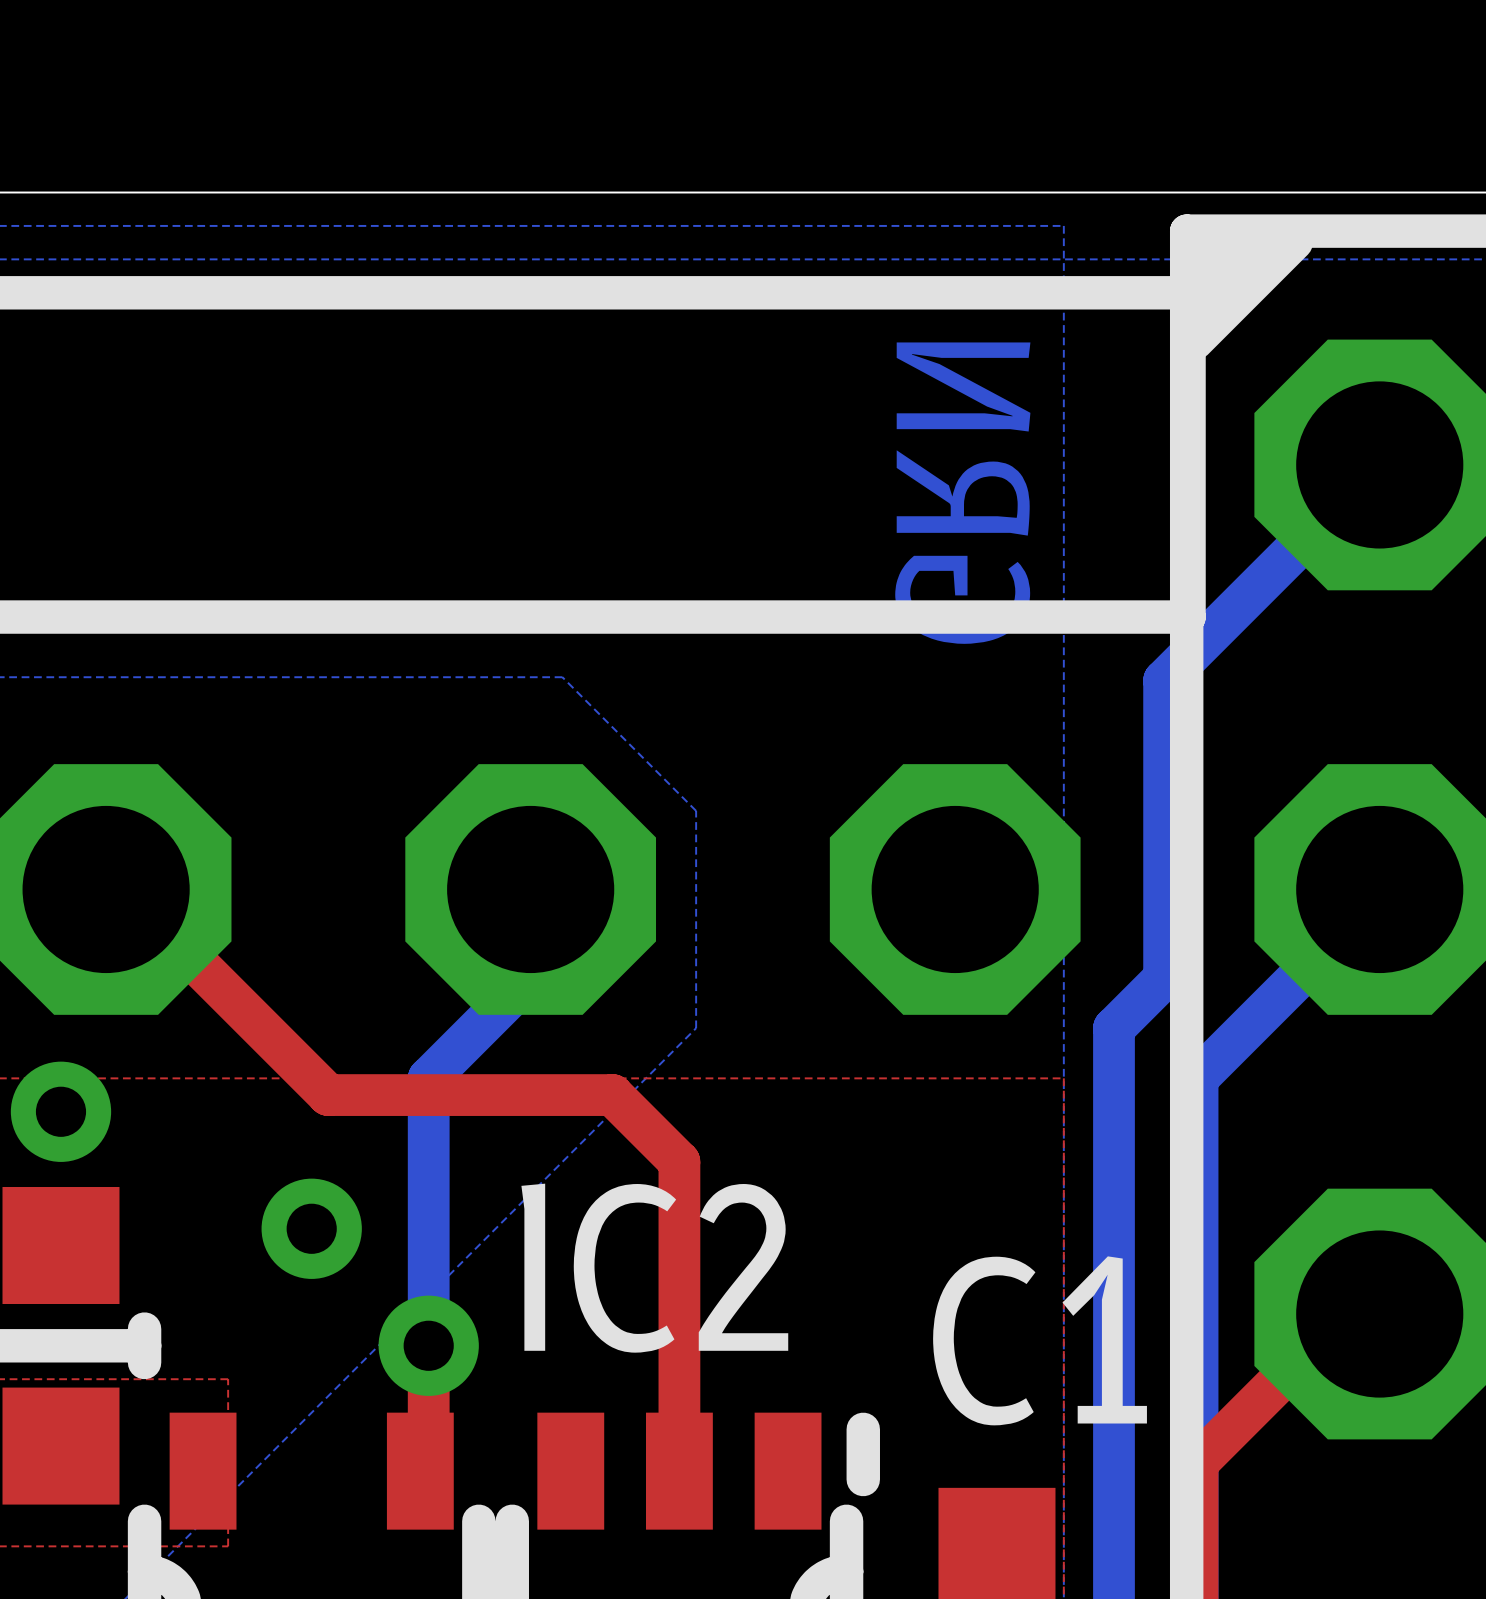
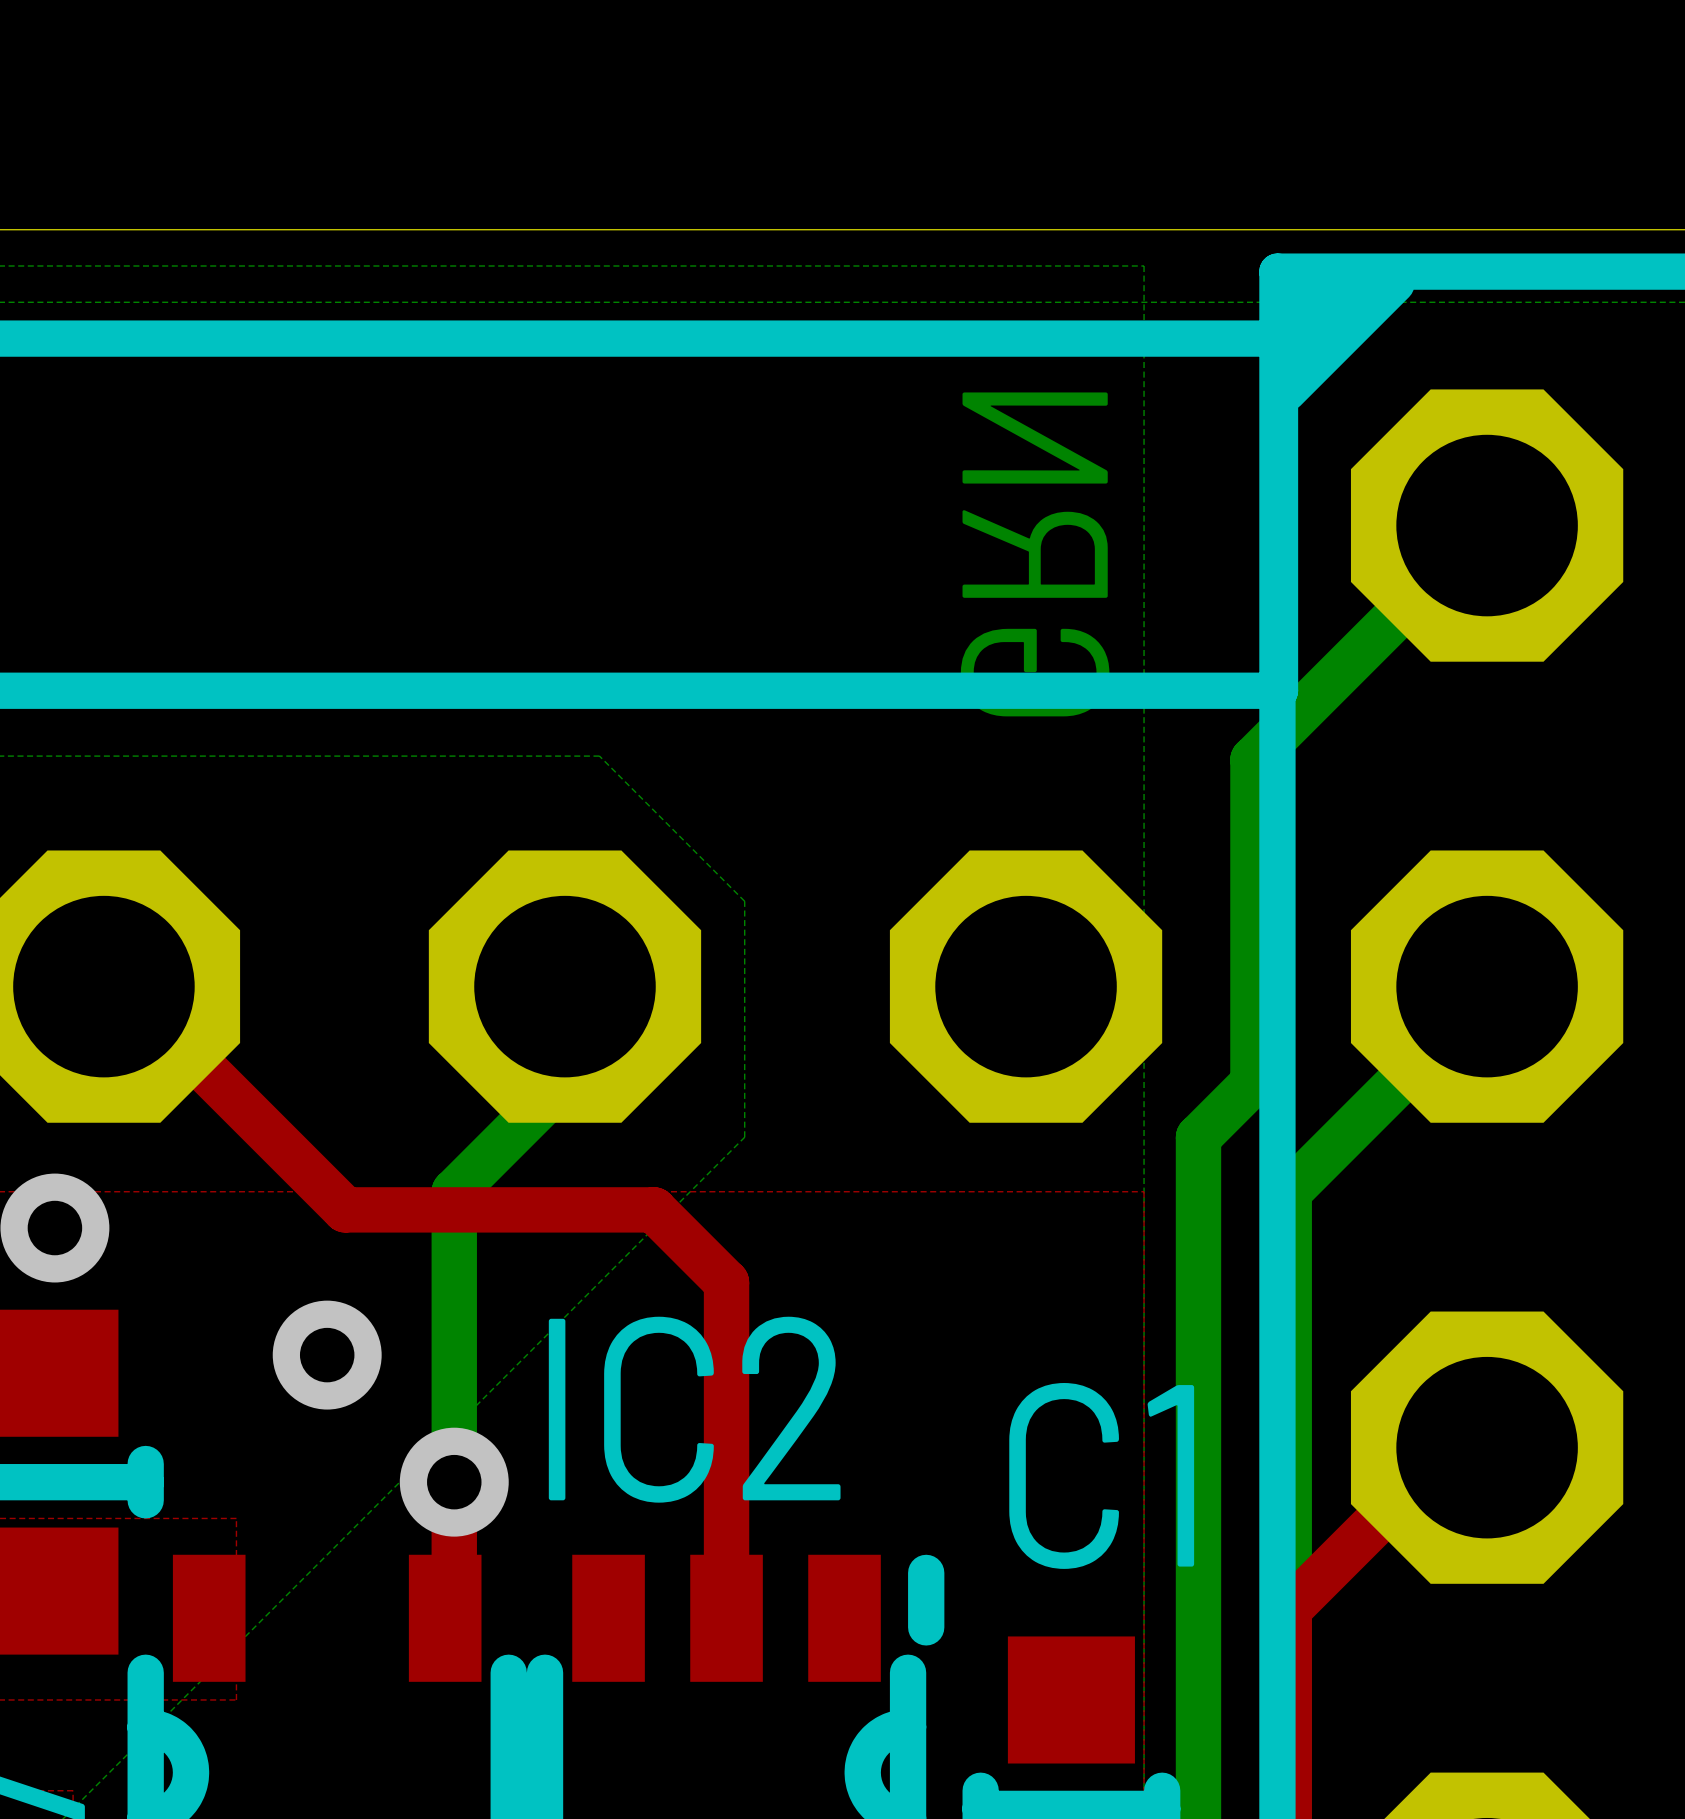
IC2 name position: IC2 (654, 1268) -> IC2 (694, 1409)

